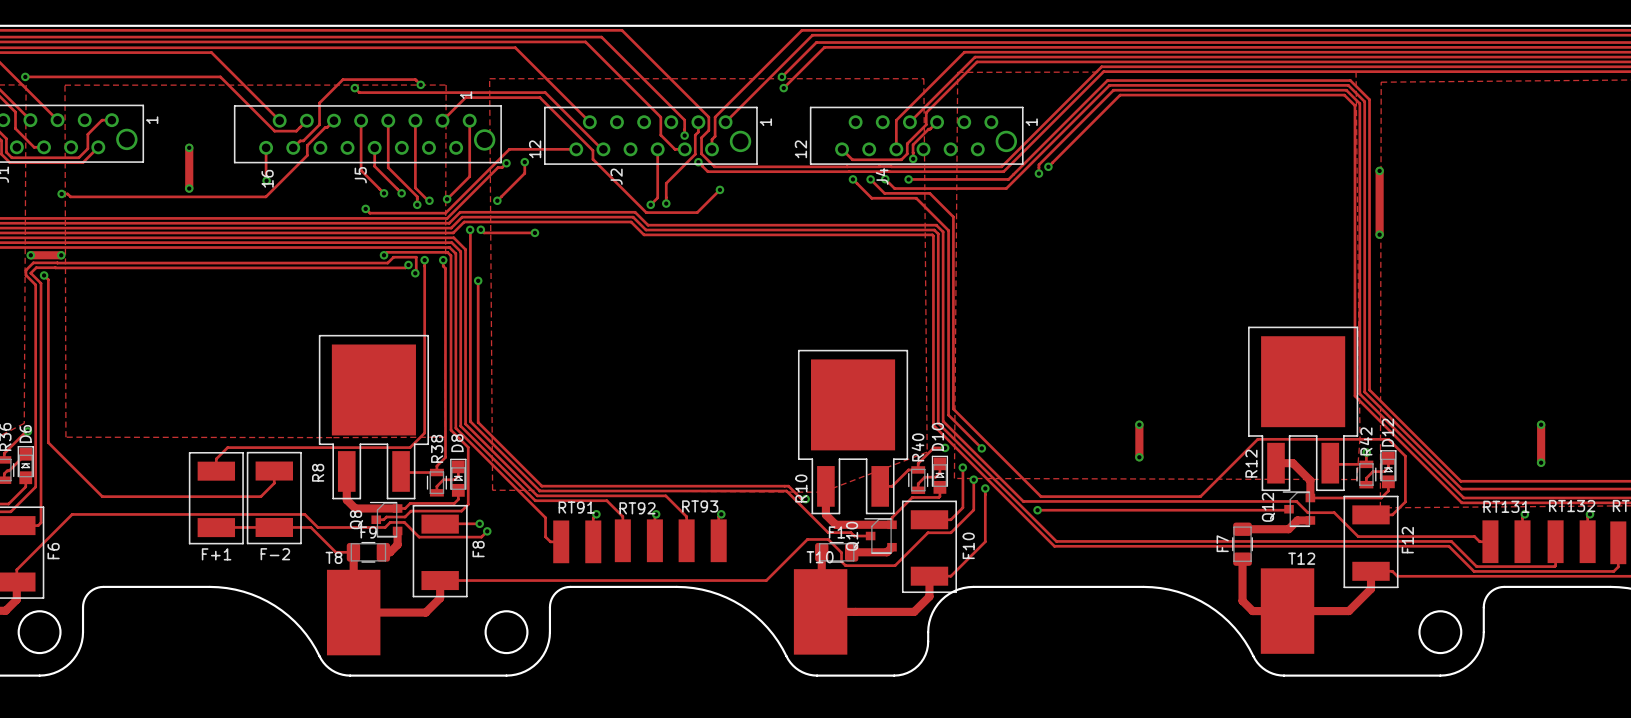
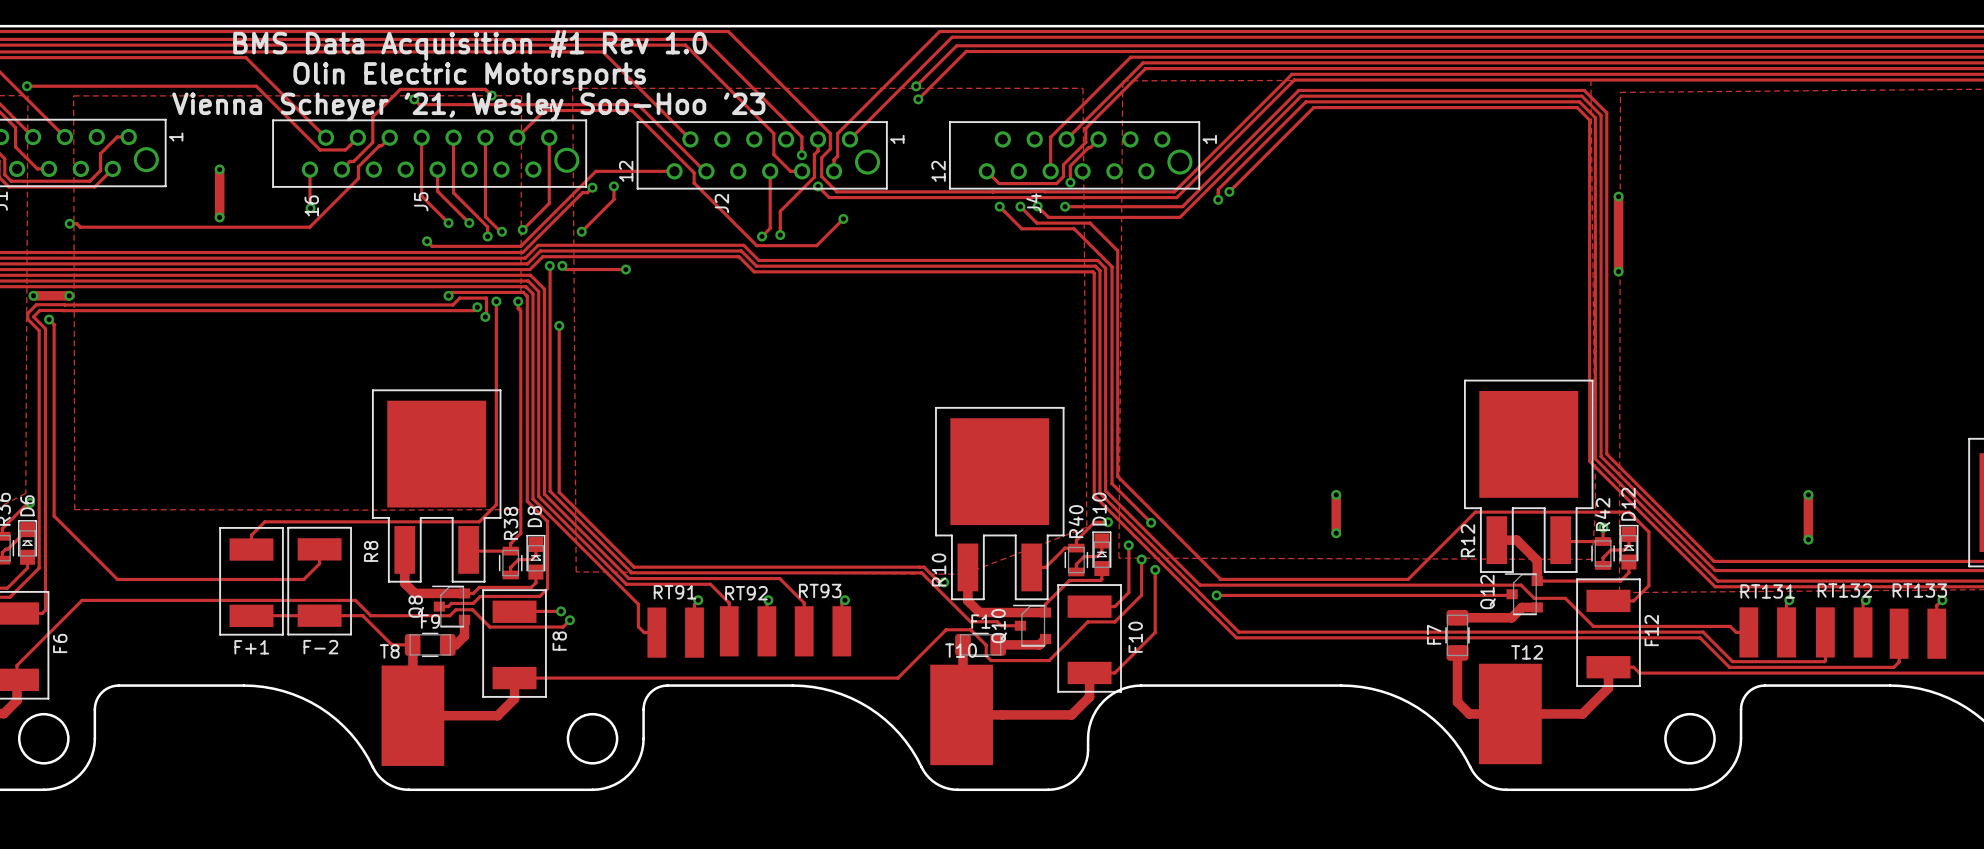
text: none -> BMS Data Acquisition #1 Rev 1.0 (470, 45)
text: none -> Olin Electric Motorsports (469, 76)
text: none -> Vienna Scheyer '21, Wesley Soo-Hoo '23 (468, 106)

